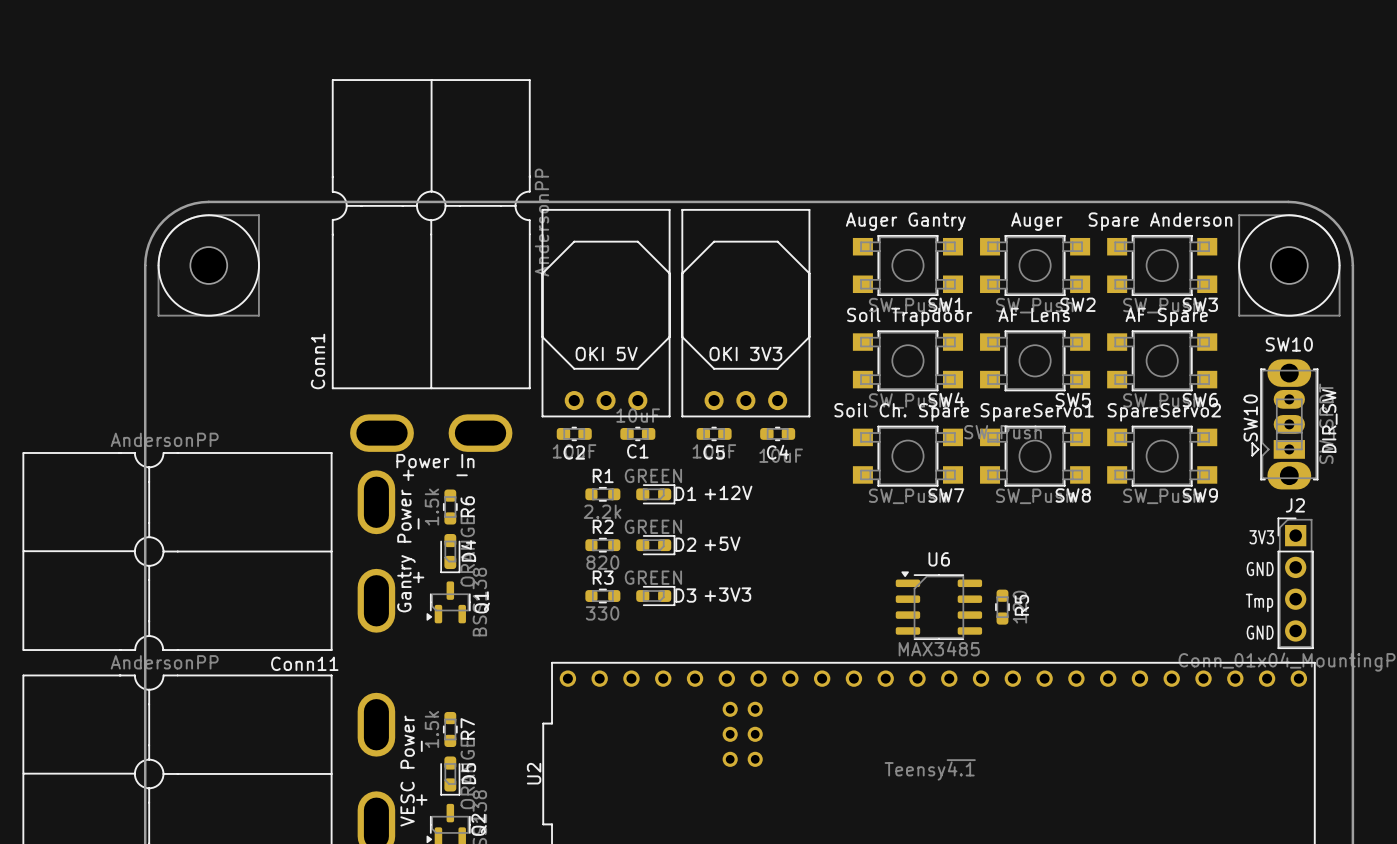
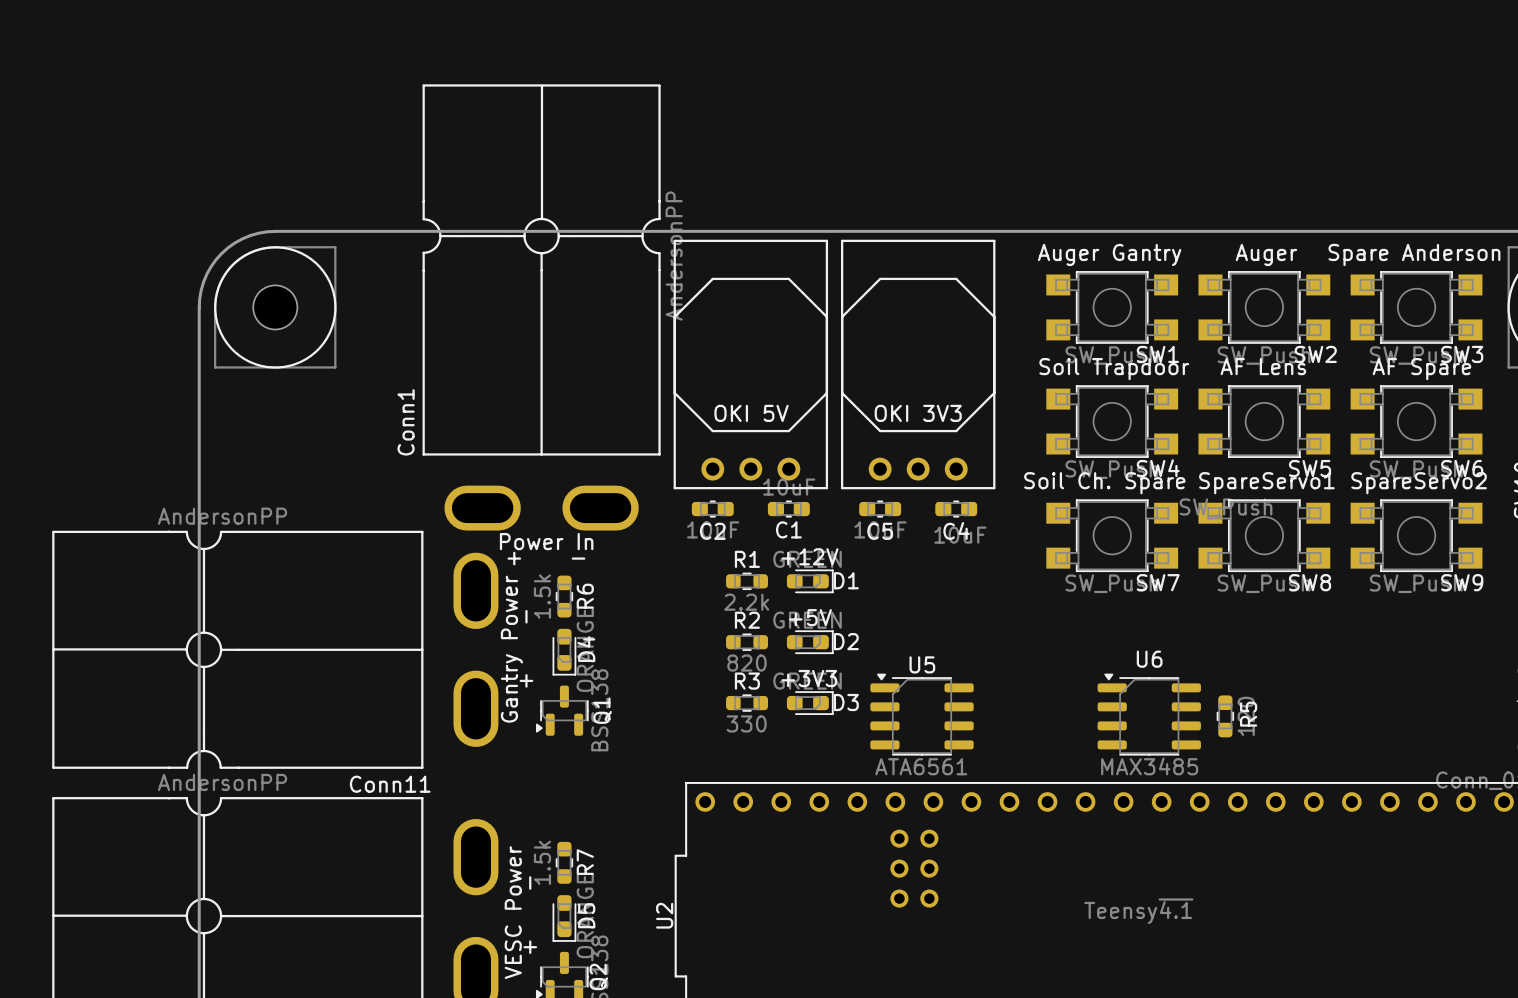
text position: +12V (728, 492) -> +12V (809, 556)
text position: +5V (722, 543) -> +5V (810, 617)
text position: +3V3 (727, 594) -> +3V3 (809, 678)
U5: none -> ATA6561 (922, 714)

